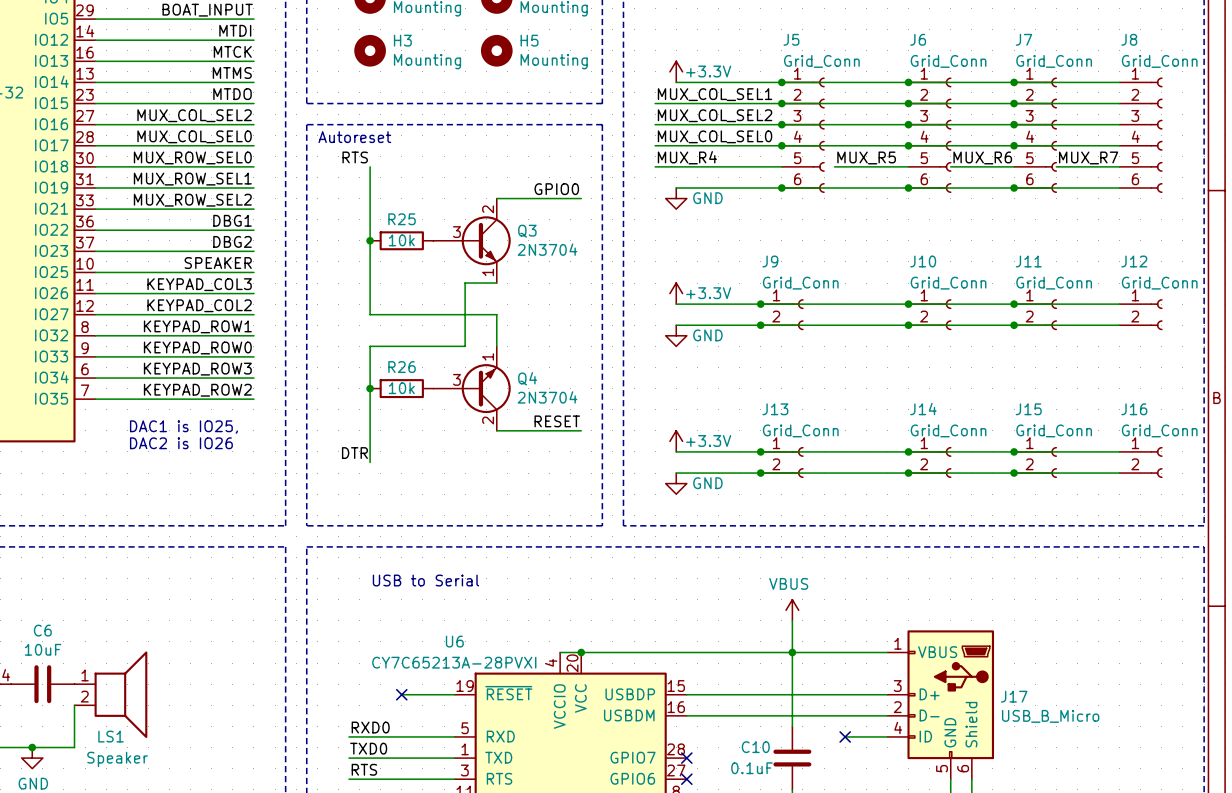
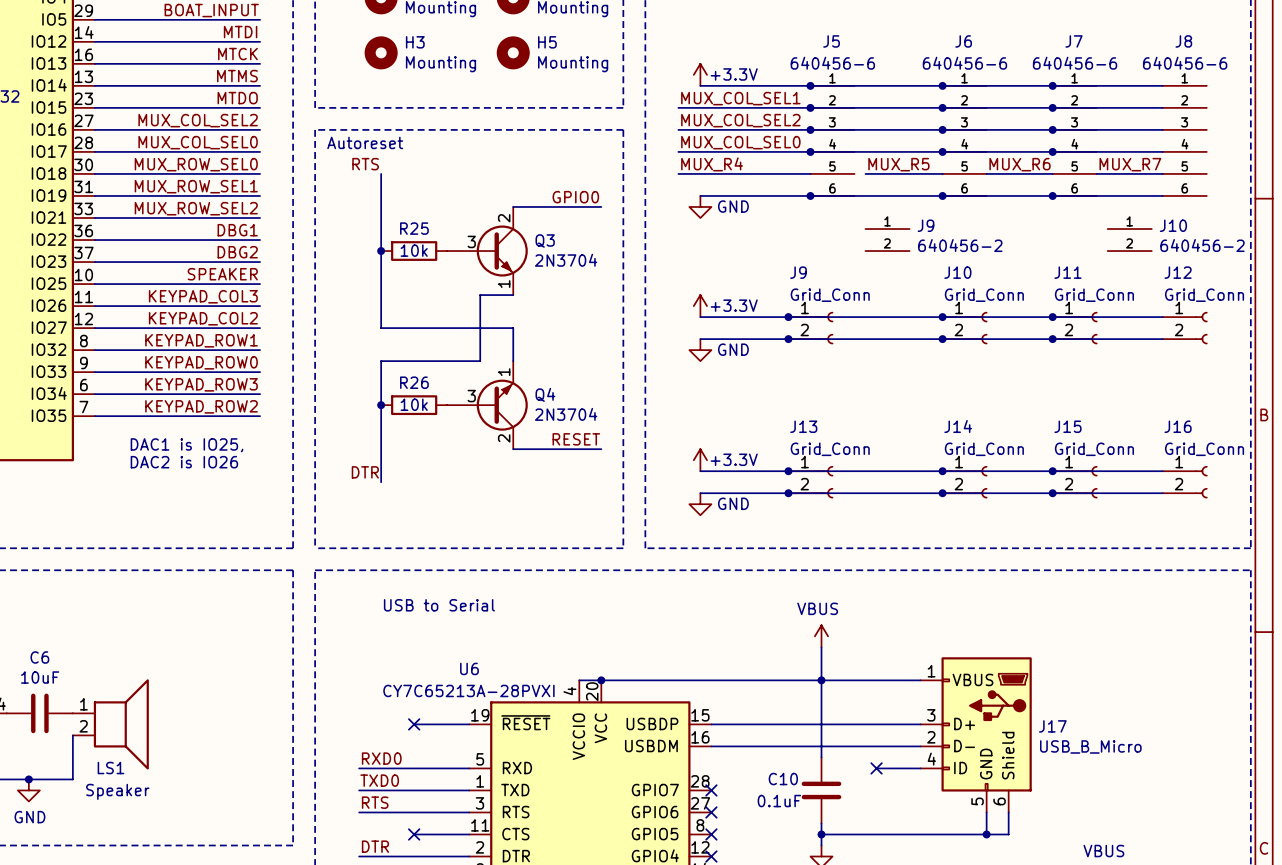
J5 value: Grid_Conn (821, 61) -> 640456-6 (832, 63)
J6 value: Grid_Conn (948, 61) -> 640456-6 (964, 63)
J7 value: Grid_Conn (1054, 61) -> 640456-6 (1075, 63)
J8 value: Grid_Conn (1159, 61) -> 640456-6 (1185, 63)
J5 symbol: [781, 77, 825, 193] -> [810, 85, 855, 196]
J6 symbol: [908, 77, 952, 193] -> [942, 85, 987, 196]
J7 symbol: [1014, 77, 1057, 193] -> [1052, 85, 1097, 196]
J8 symbol: [1119, 77, 1163, 193] -> [1162, 85, 1207, 196]
J9: none -> 640456-2 (887, 240)
J10: none -> 640456-2 (1129, 240)

